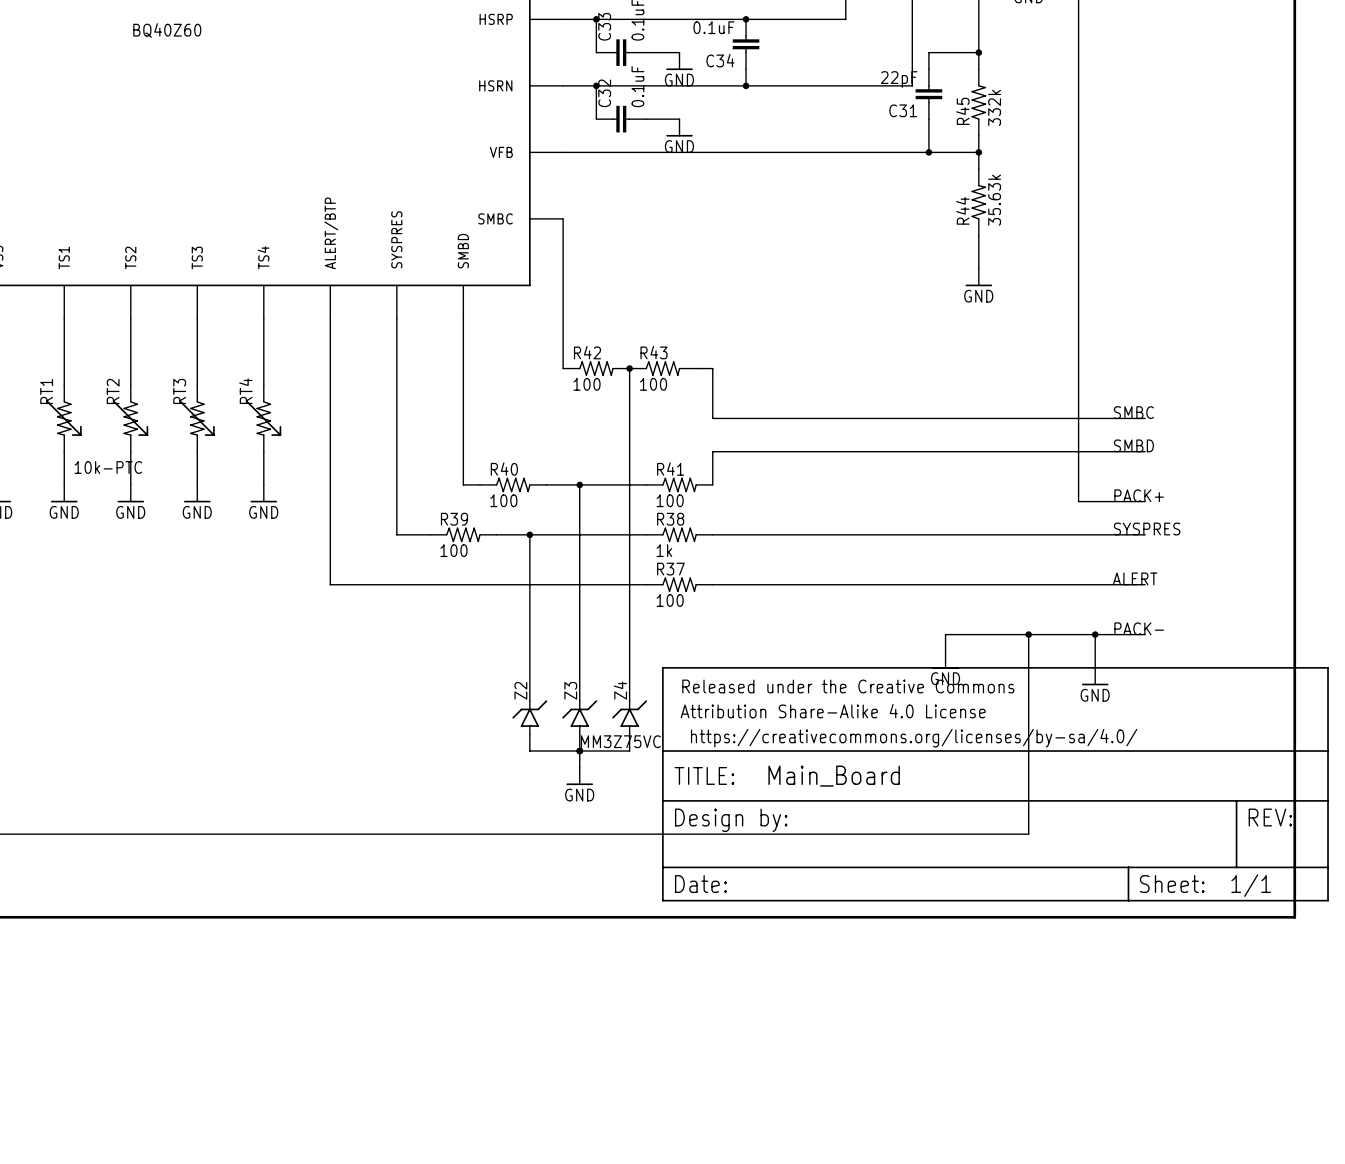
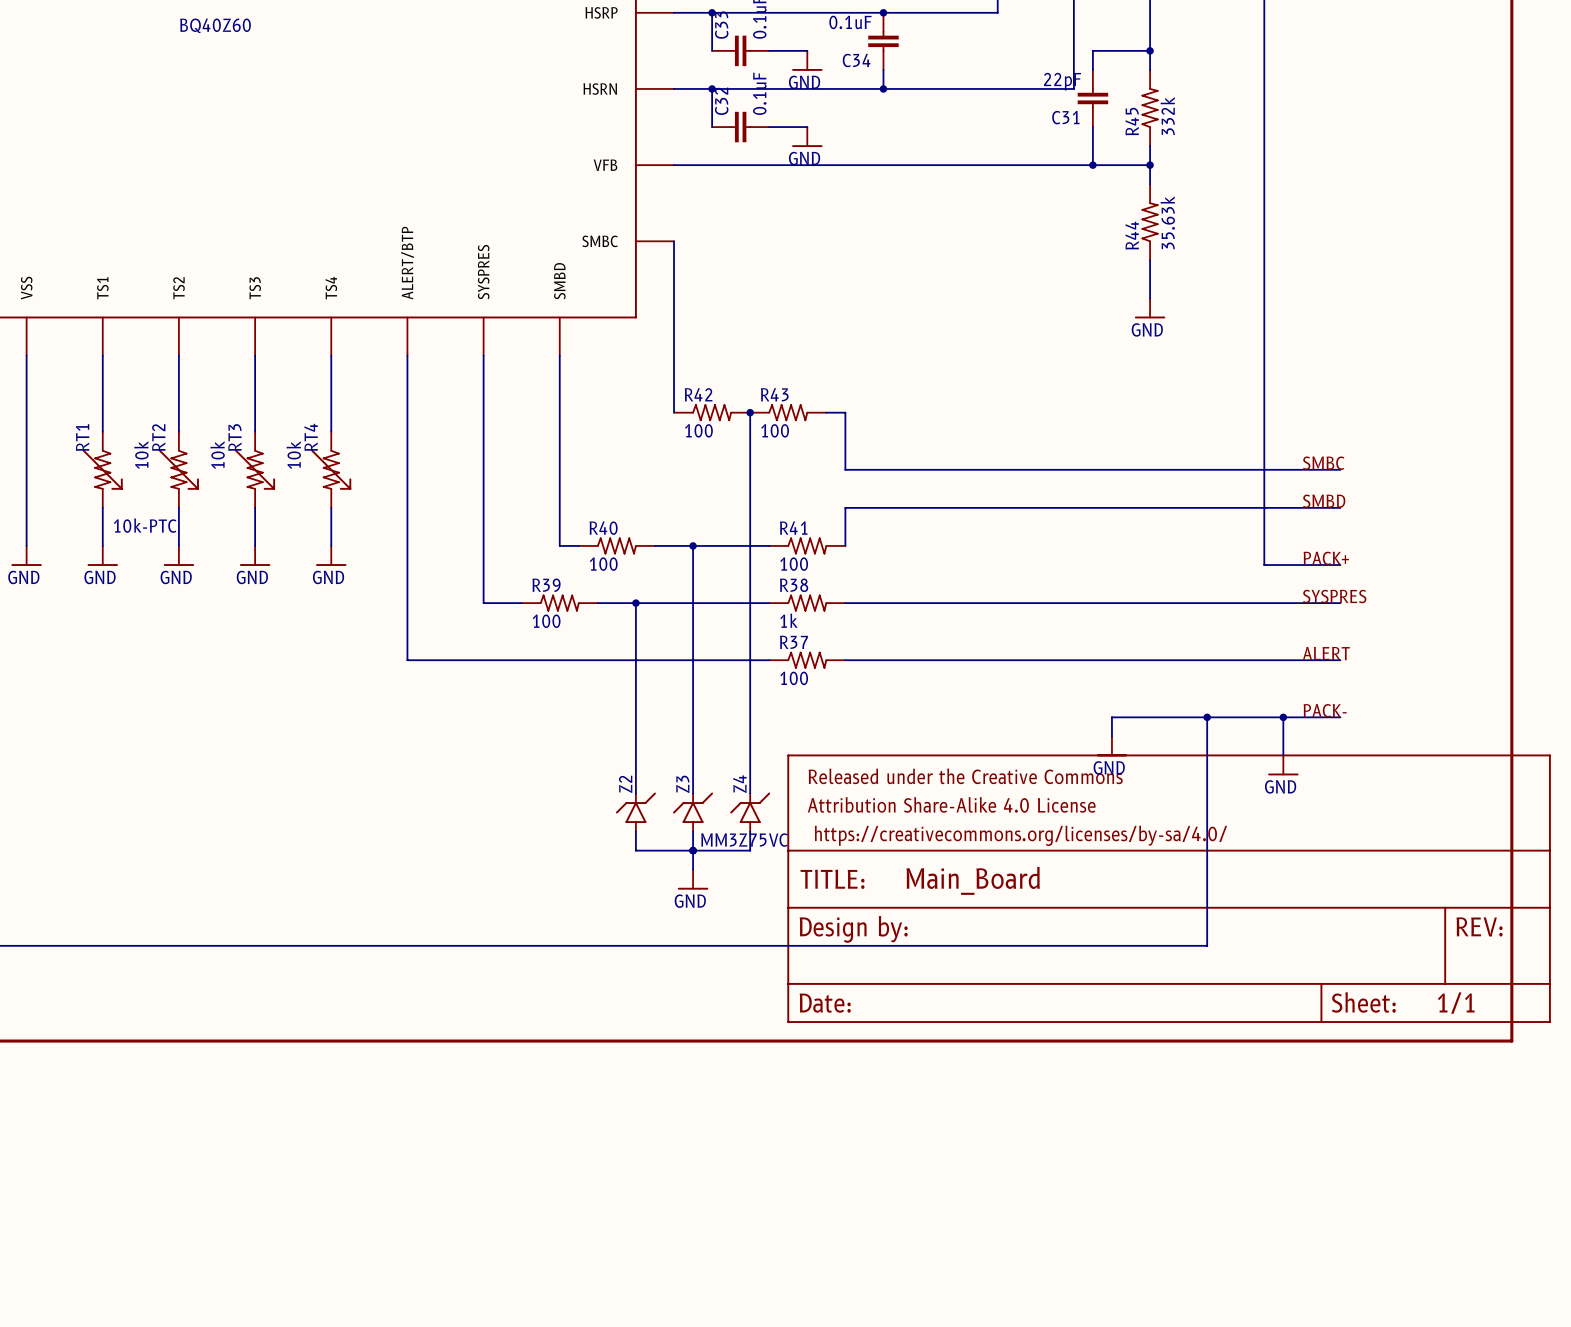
RT2 value: none -> 10k (141, 455)
RT3 value: none -> 10k (217, 455)
RT4 value: none -> 10k (293, 455)

